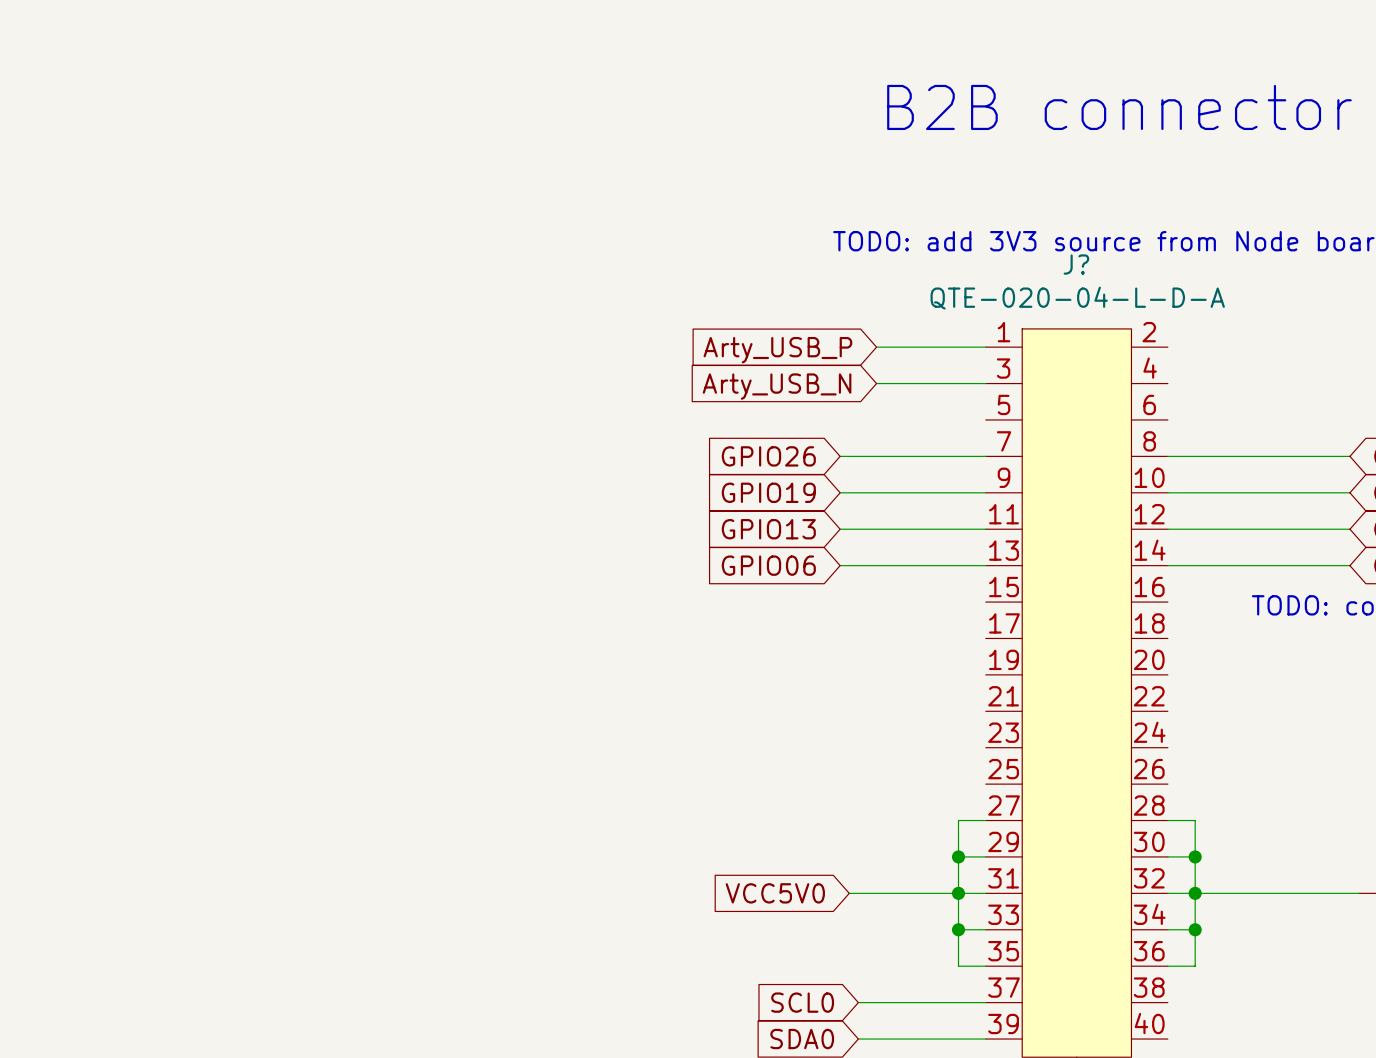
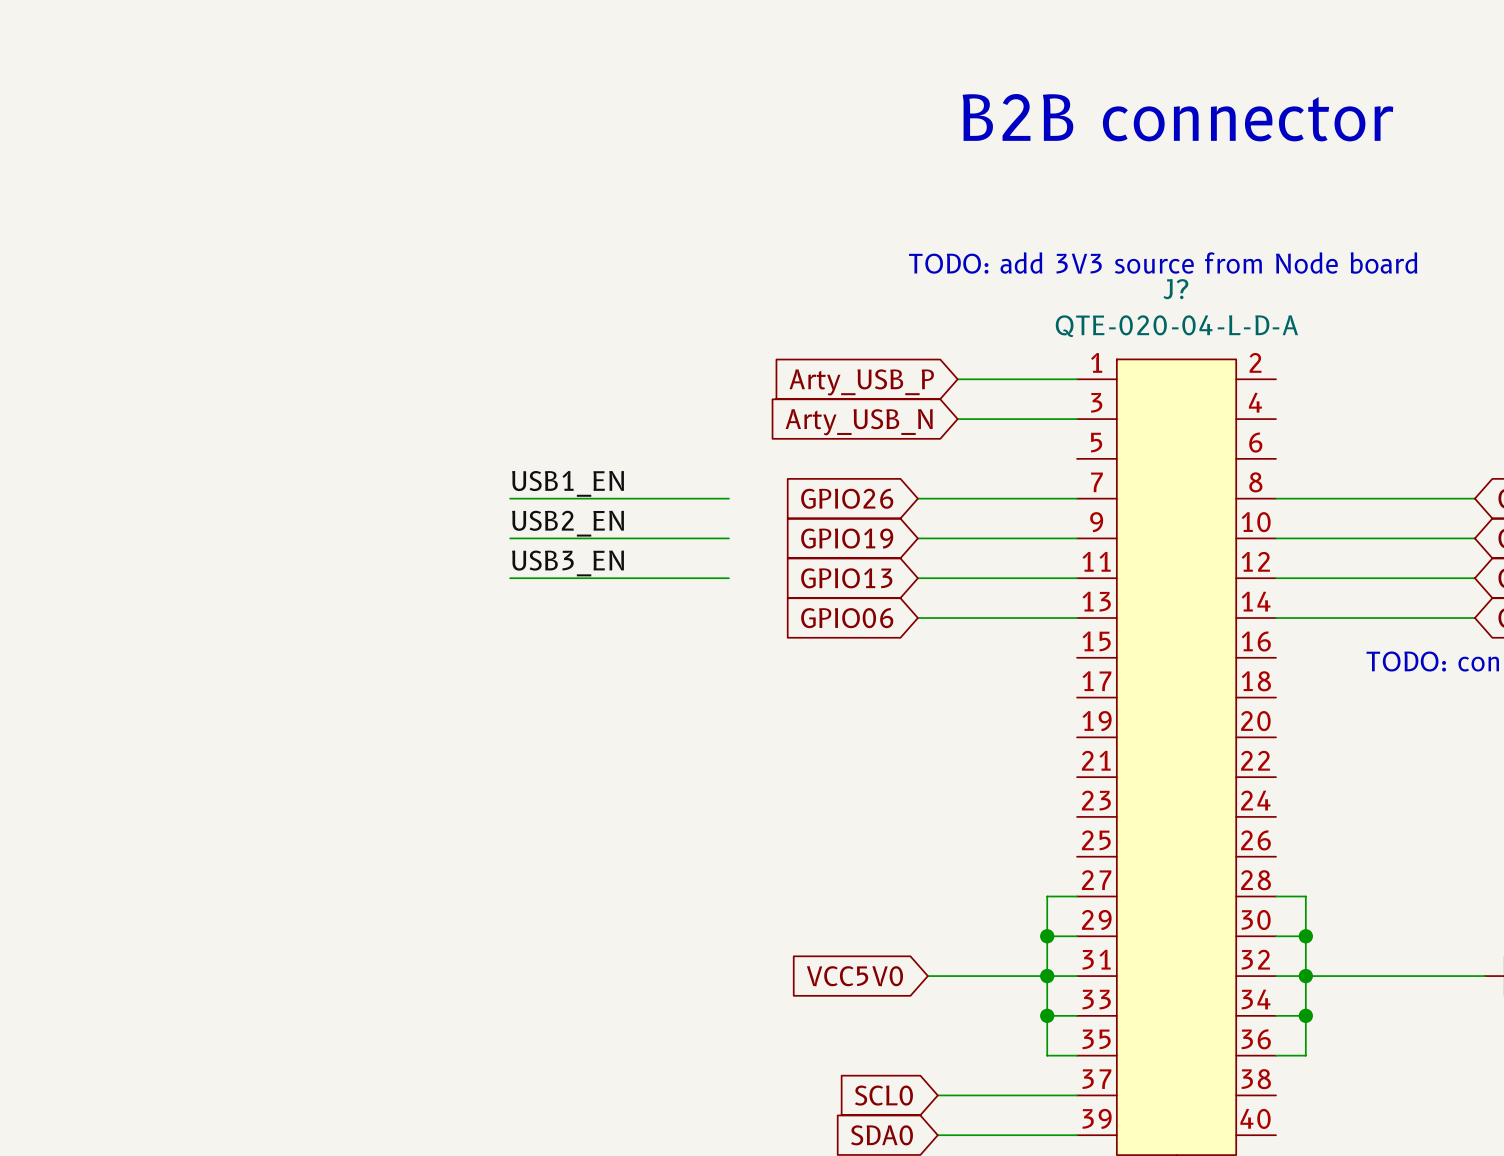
label: none -> USB1_EN (568, 483)
wire: none -> (510, 498) (728, 498)
label: none -> USB2_EN (568, 523)
wire: none -> (510, 538) (728, 538)
label: none -> USB3_EN (568, 563)
wire: none -> (510, 578) (728, 578)

